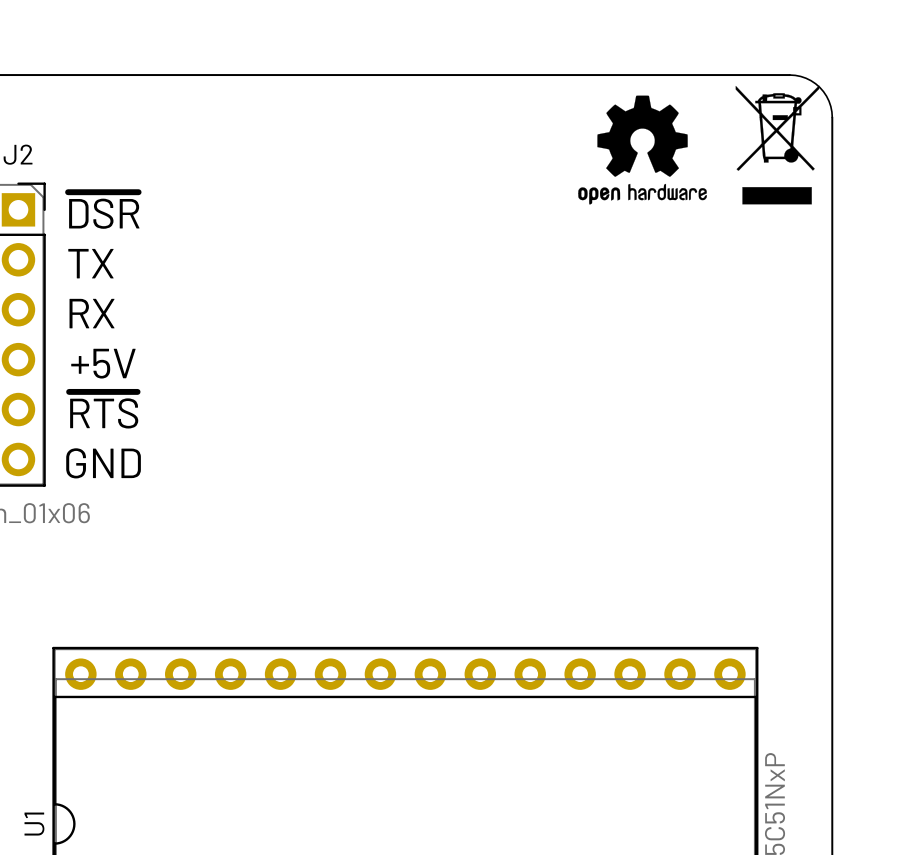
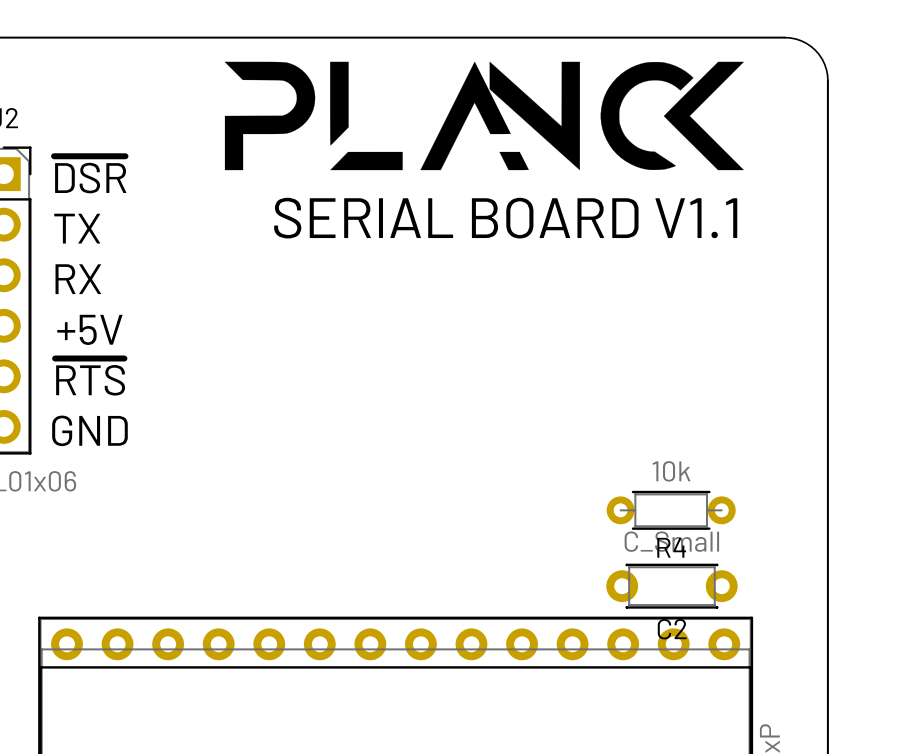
drawing: [735, 85, 820, 205] -> none
drawing: [578, 95, 707, 205] -> none
drawing: none -> [224, 61, 744, 171]
text: none -> SERIAL BOARD V1.1 (505, 218)
R4: none -> 10k (671, 510)
C2: none -> C_Small (671, 586)

